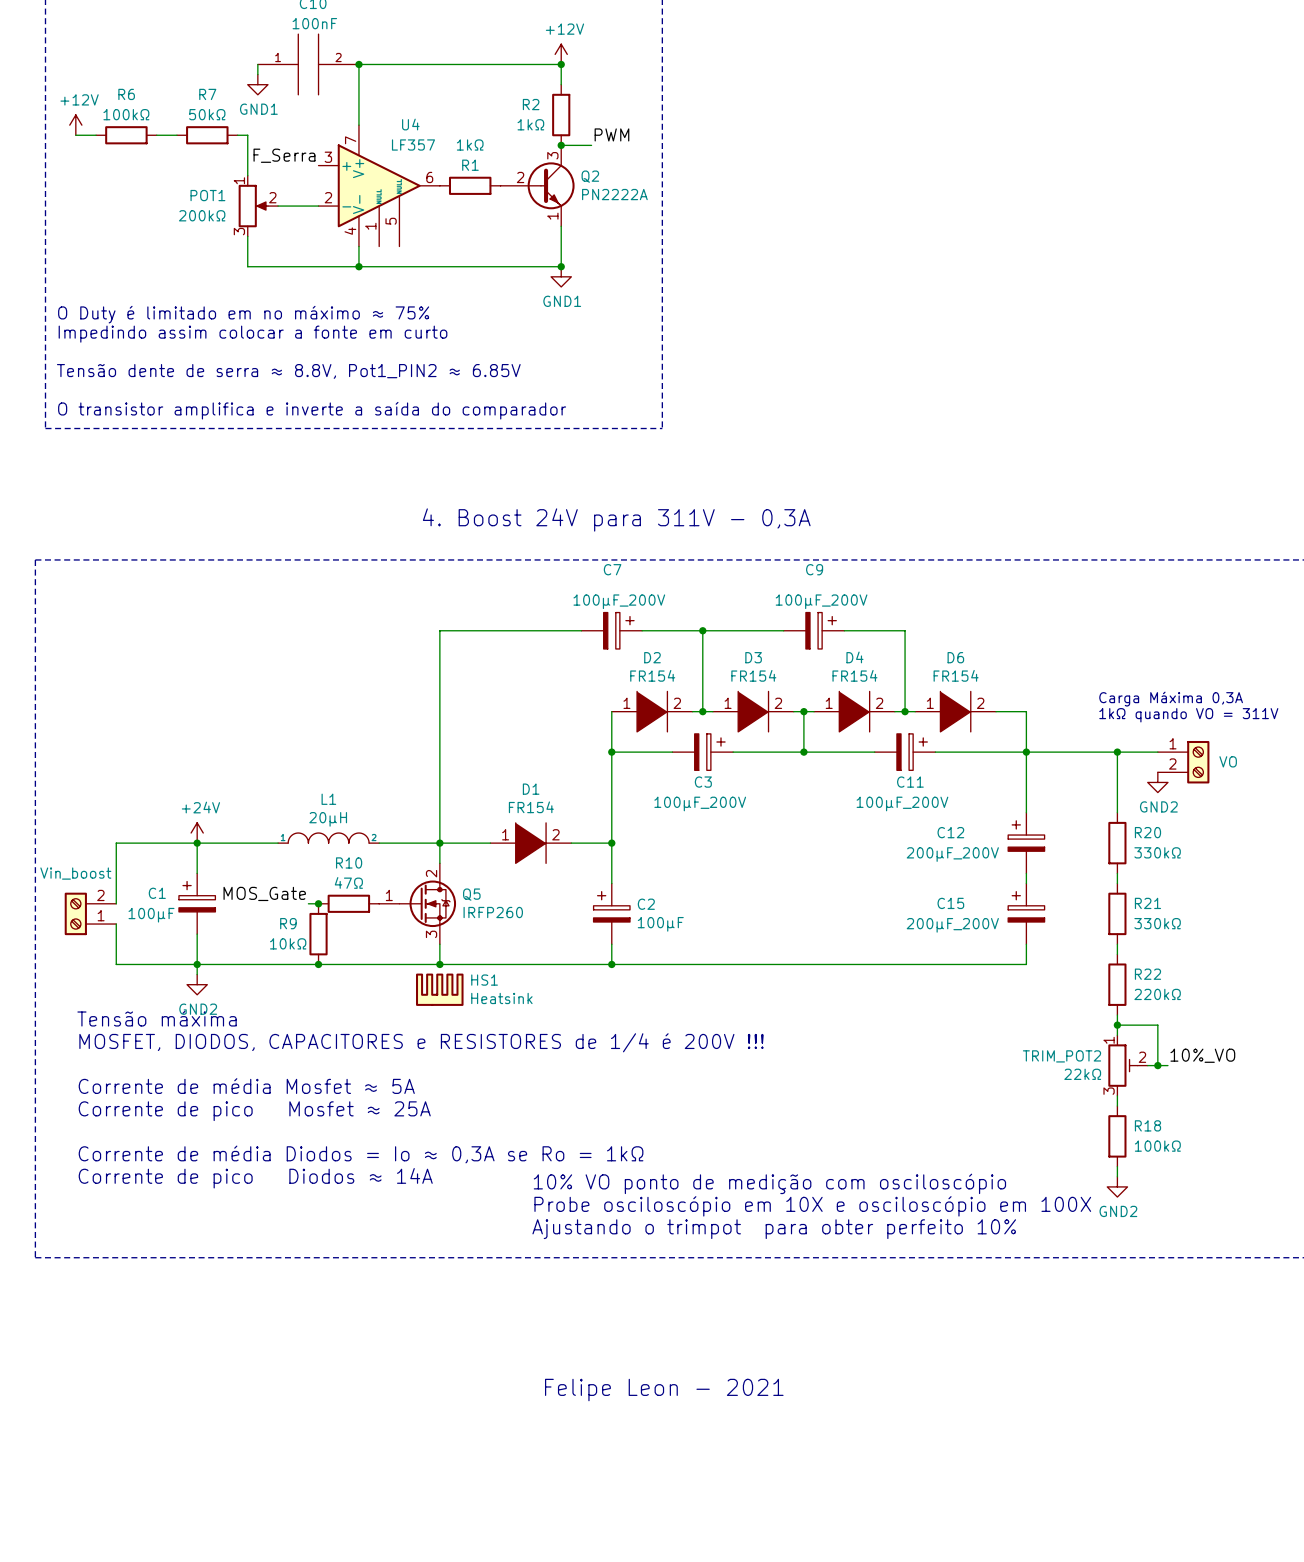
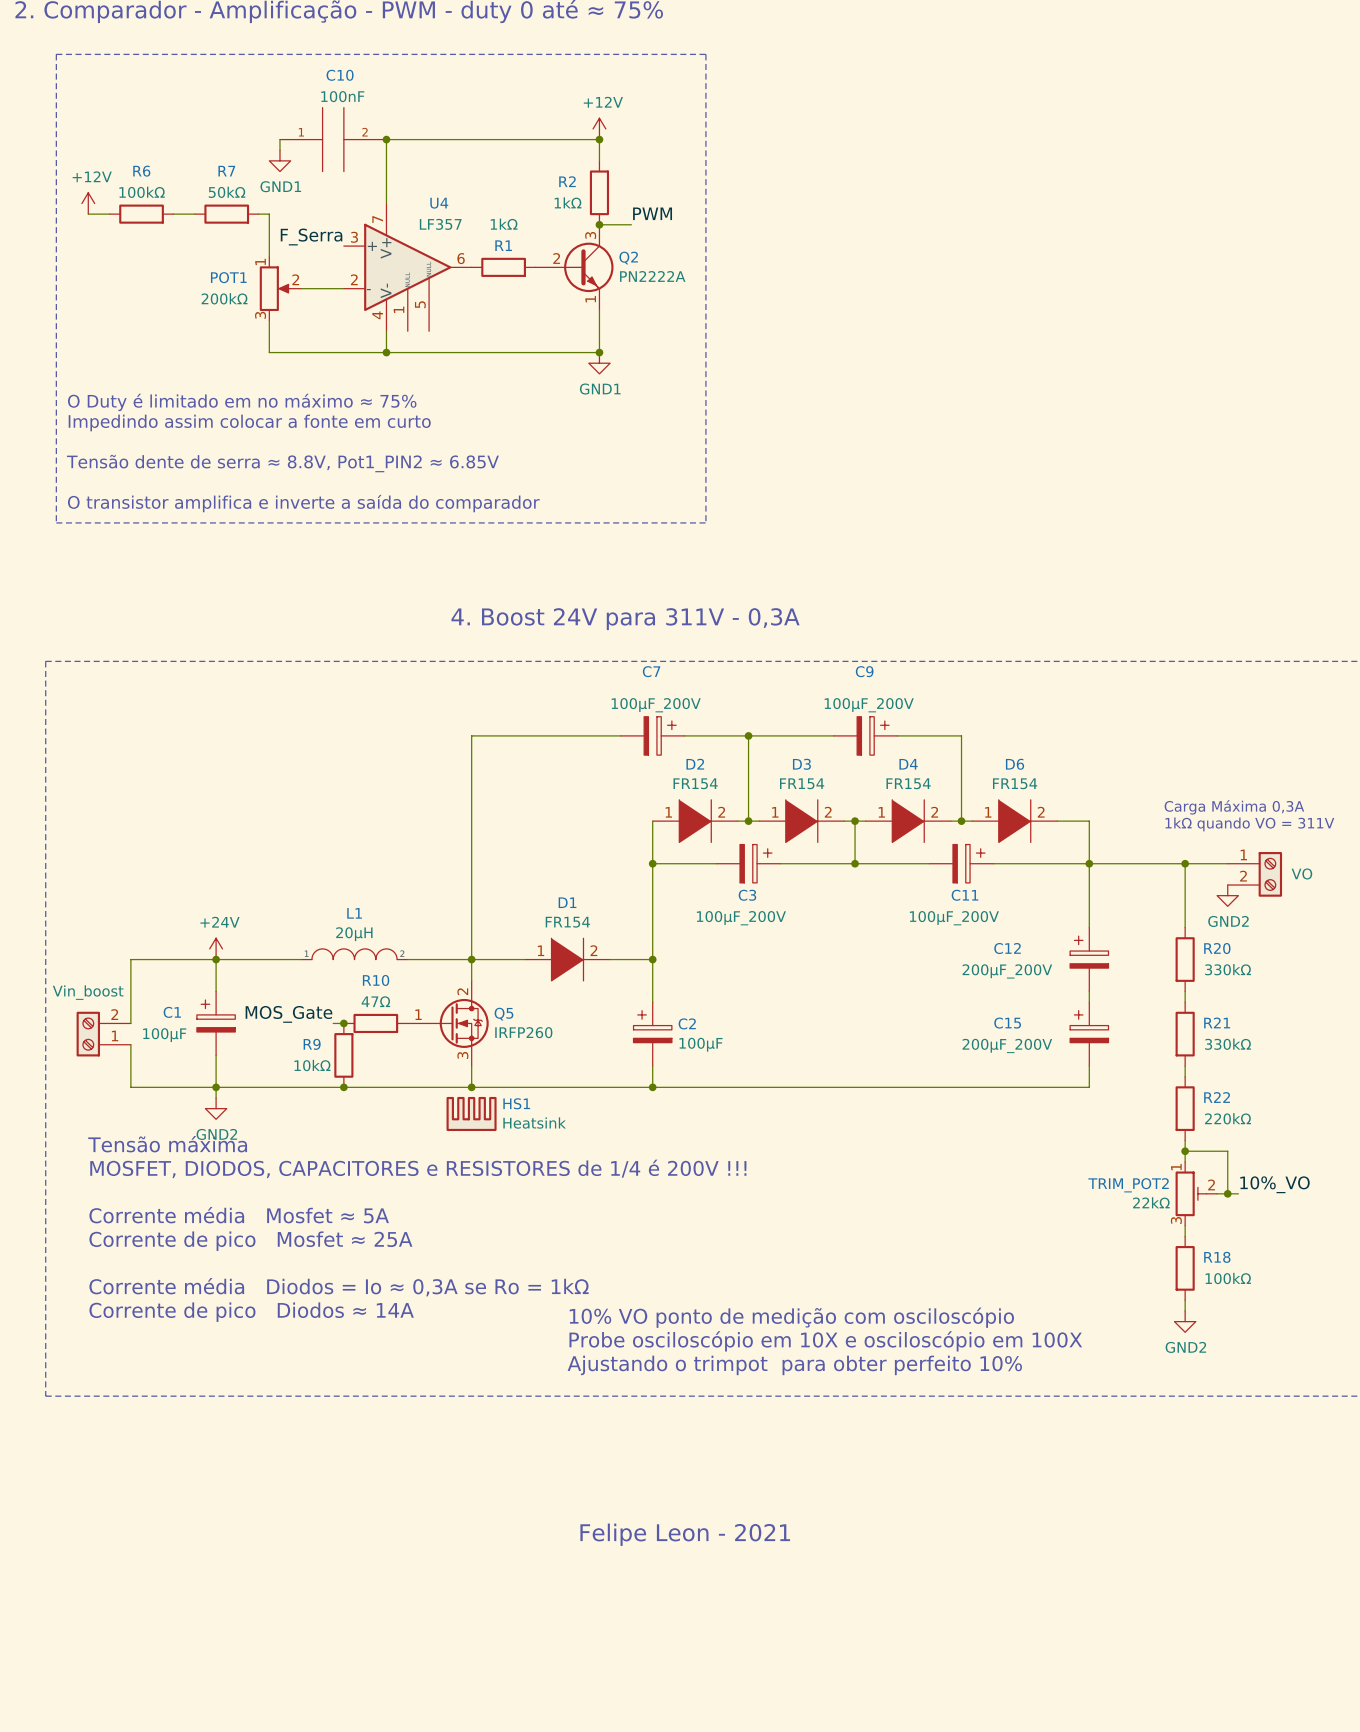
text: Corrente de média Mosfet ≈ 5A (246, 1086) -> Corrente média Mosfet ≈ 5A (239, 1215)
text: Corrente de média Diodos = Io ≈ 0,3A se Ro = 1kΩ (361, 1154) -> Corrente média Diodos = Io ≈ 0,3A se Ro = 1kΩ (339, 1287)

